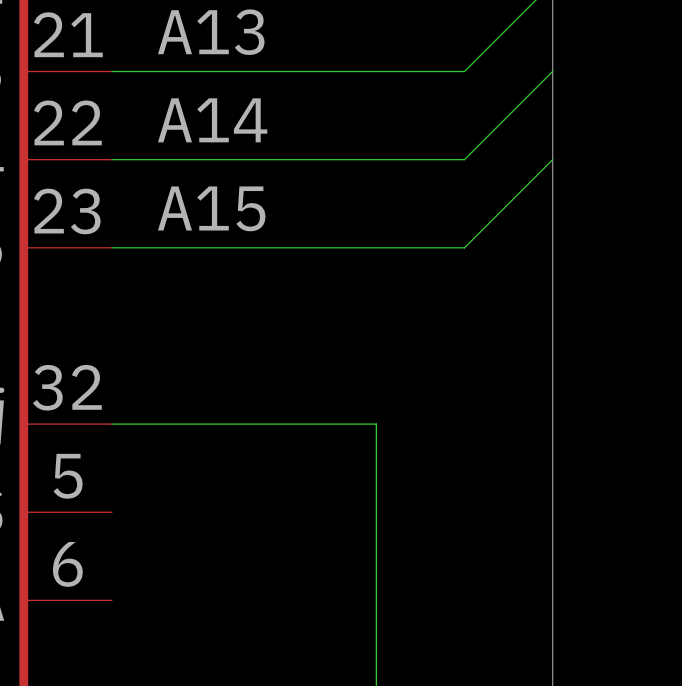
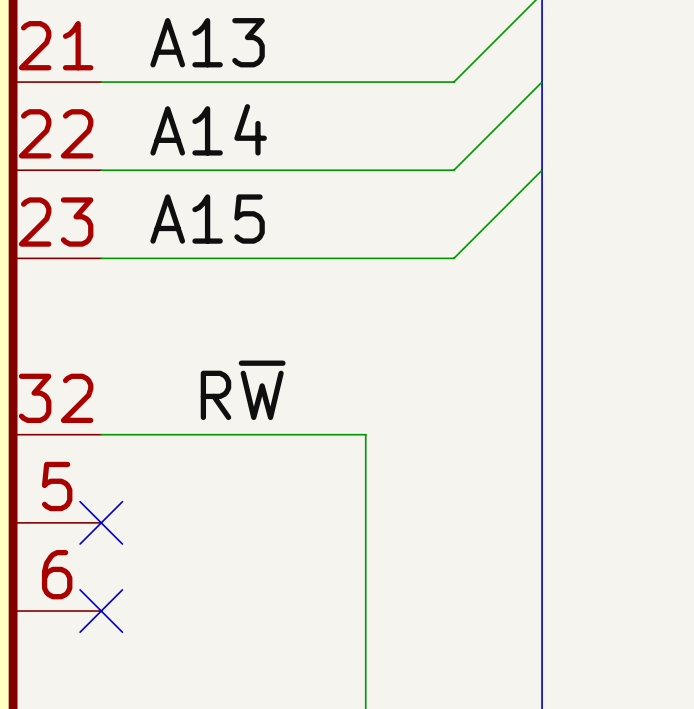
label: none -> R~{W} (243, 390)
no-connect mark: none -> (101, 522)
no-connect mark: none -> (101, 611)

